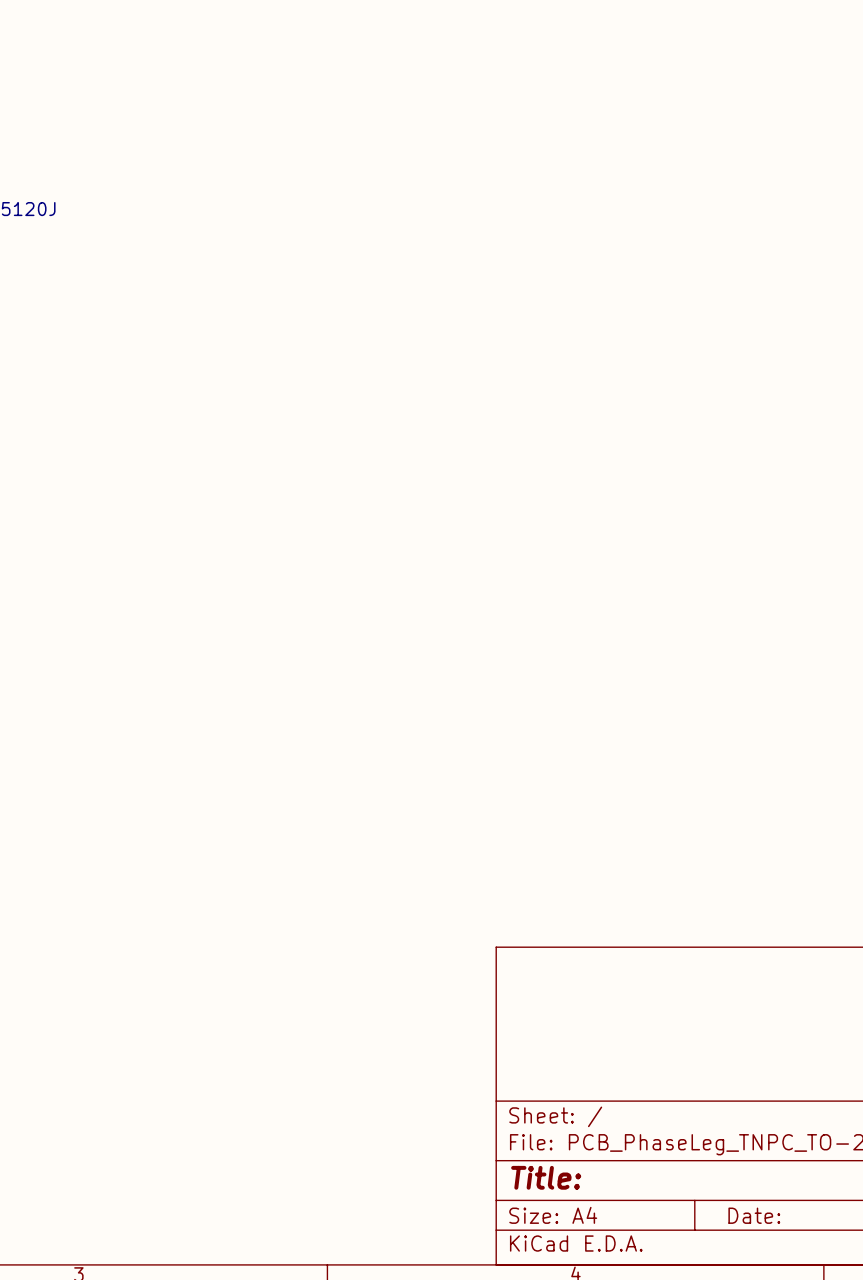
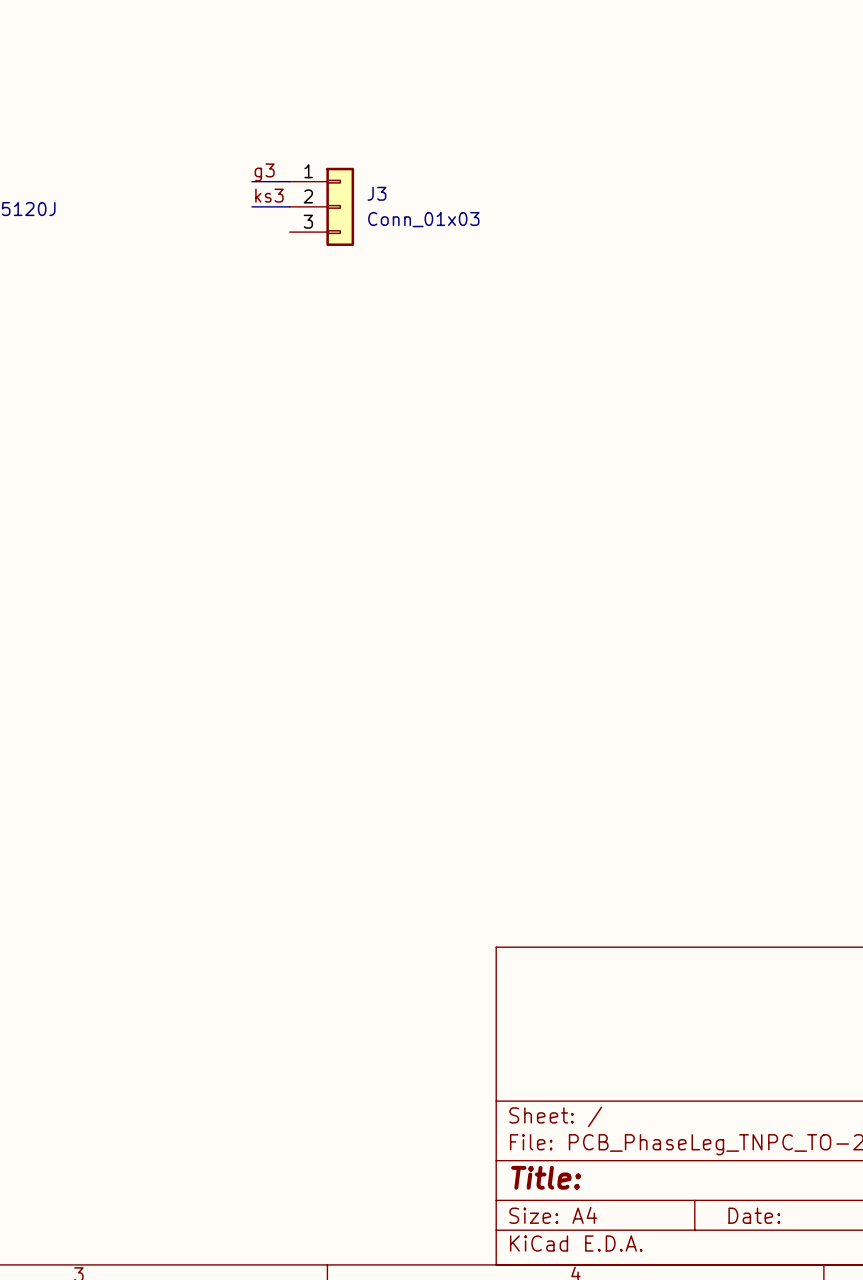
label: none -> g3 (264, 172)
wire: none -> (251, 181) (289, 181)
label: none -> ks3 (269, 195)
wire: none -> (251, 206) (289, 206)
J3: none -> Conn_01x03 (321, 206)

